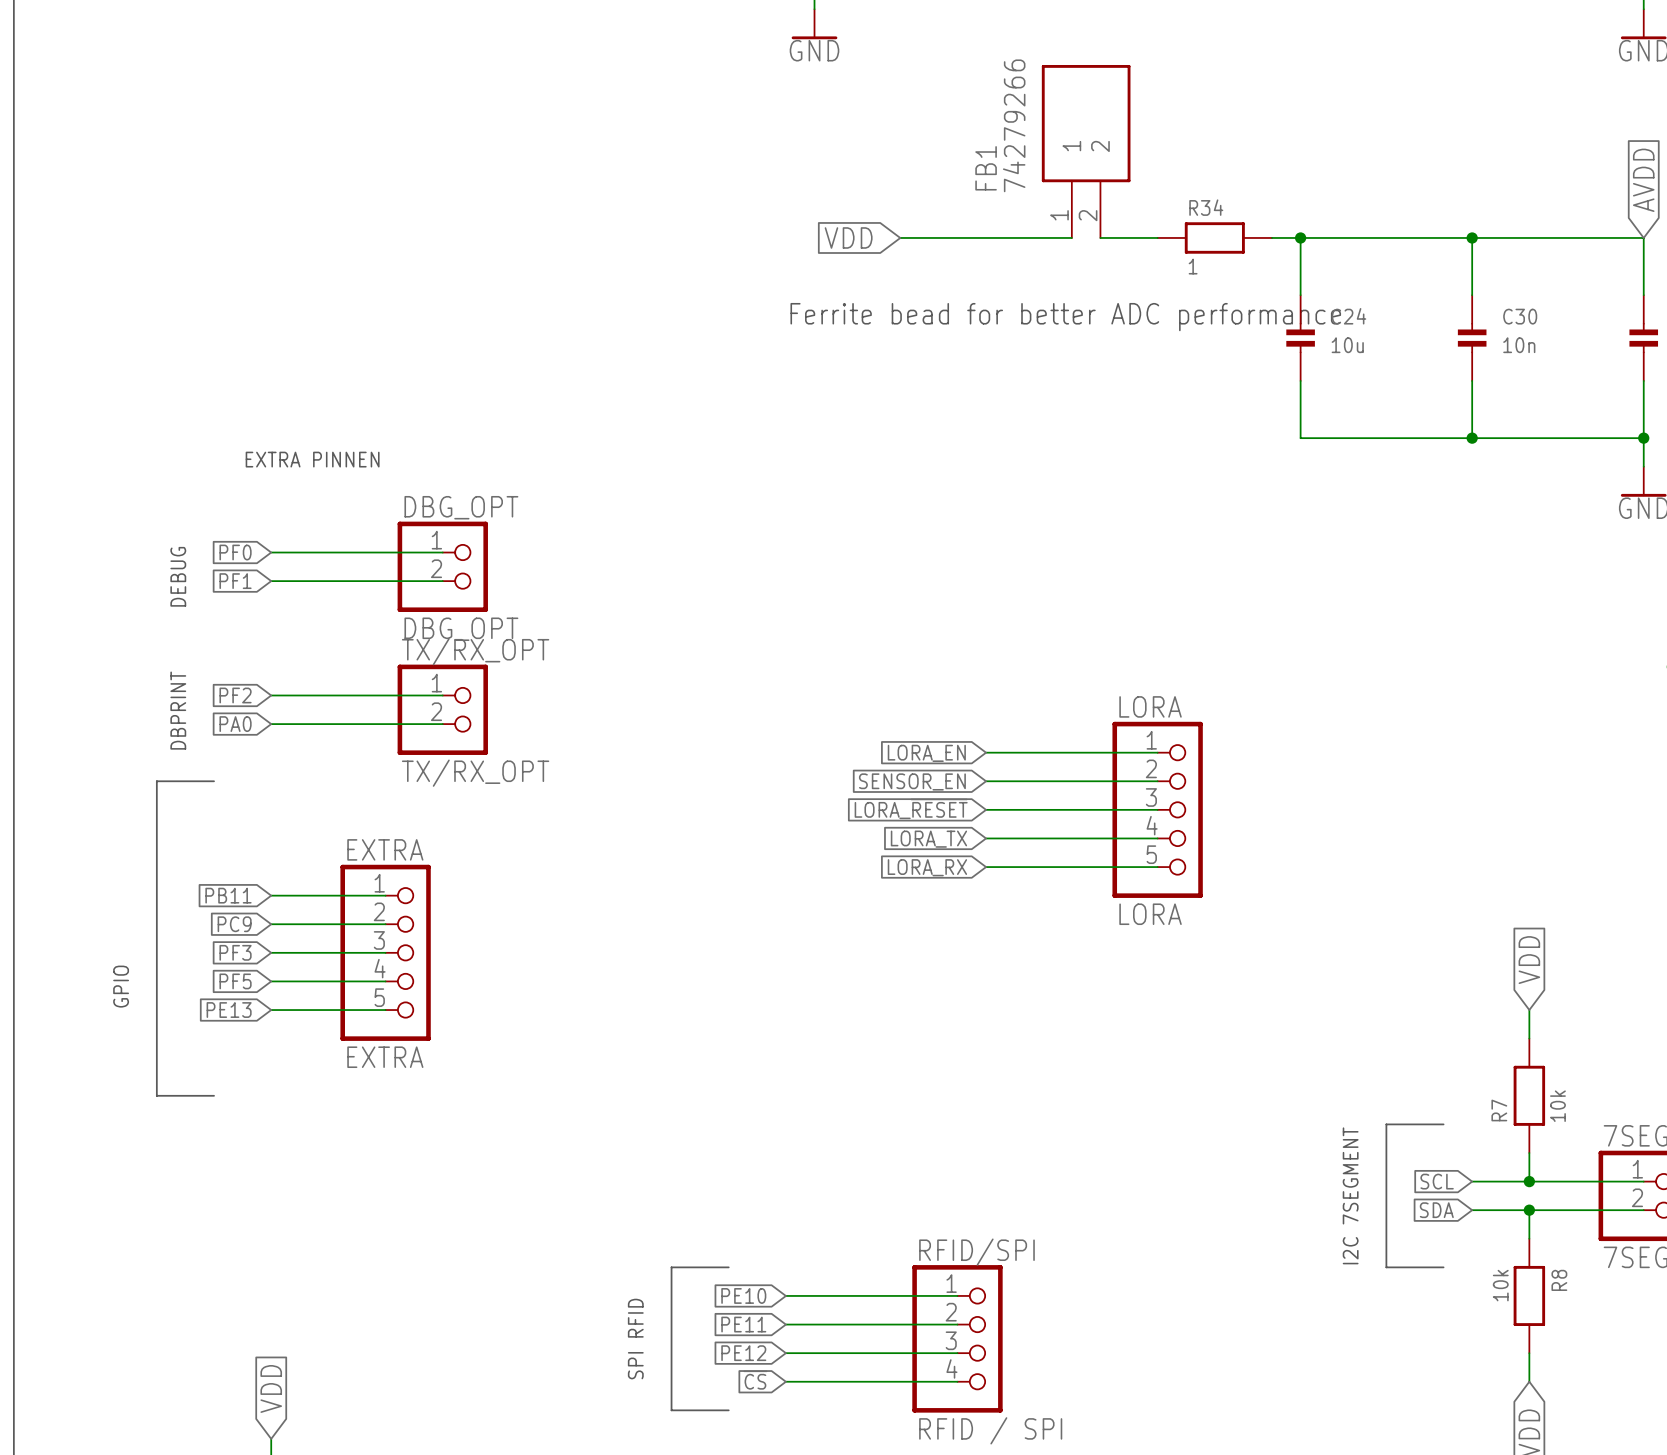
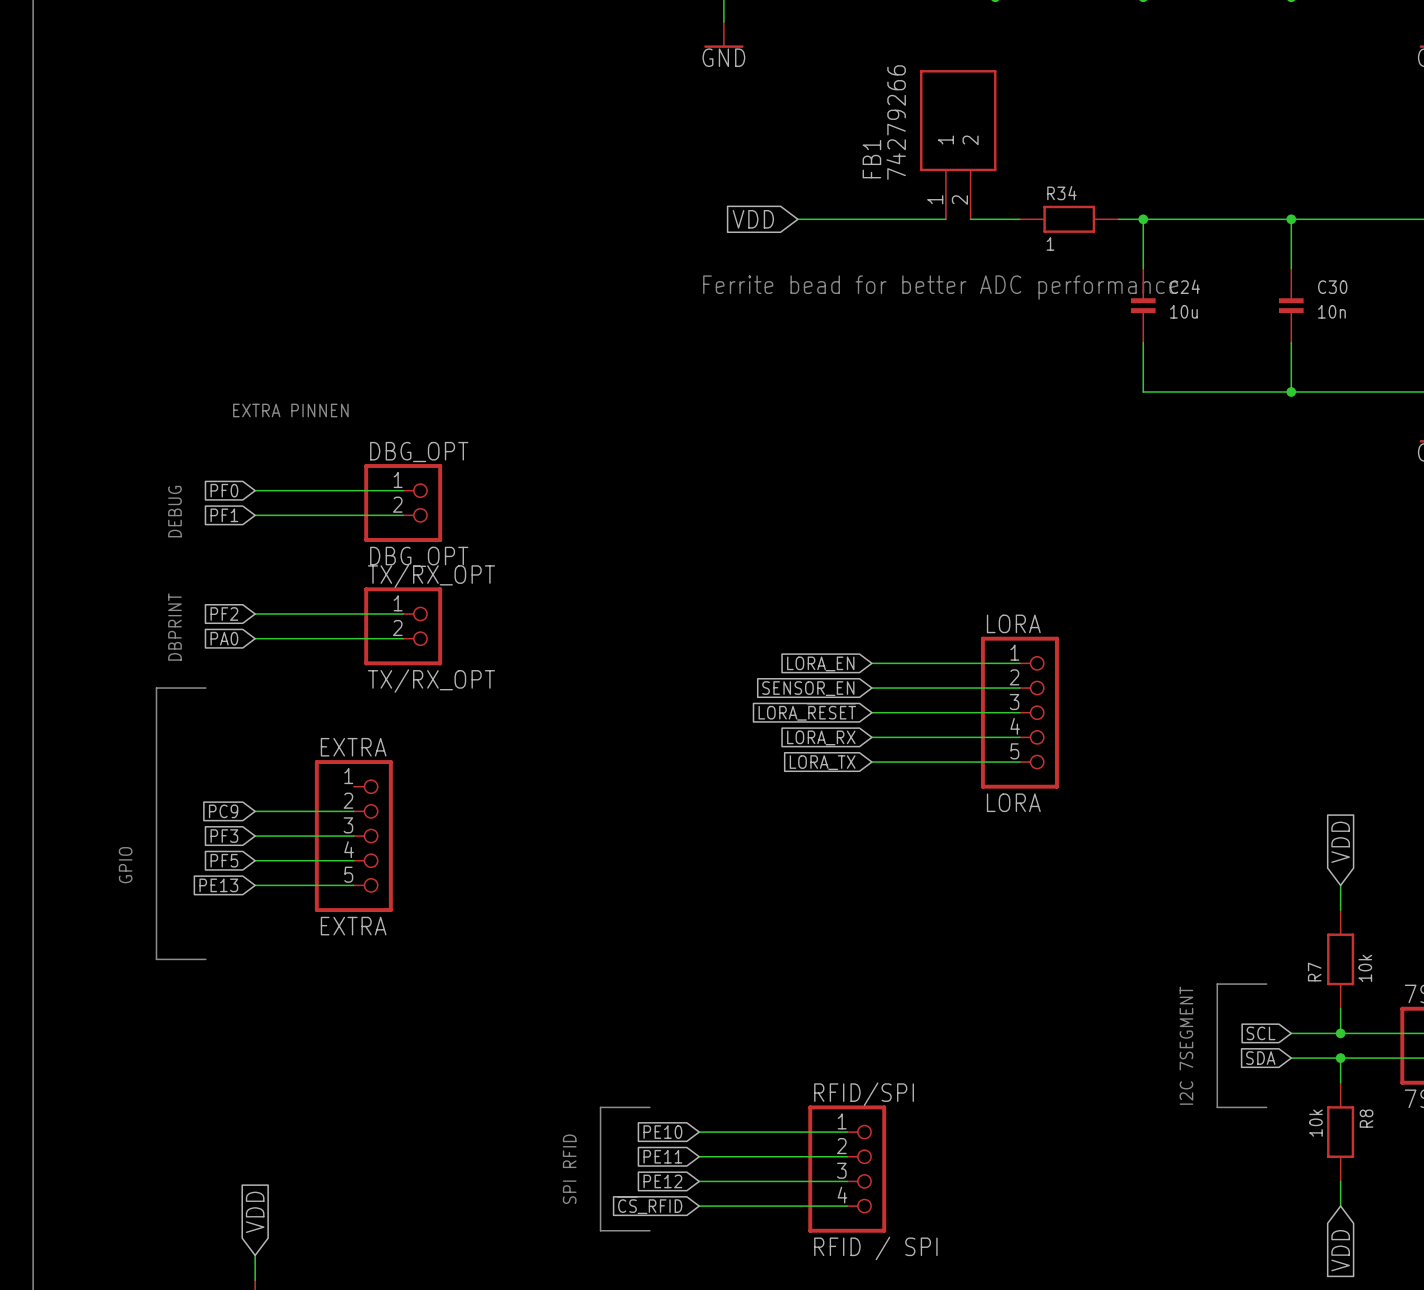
global label: LORA_TX (928, 839) -> LORA_RX (821, 737)
global label: LORA_RX (927, 867) -> LORA_TX (822, 762)
global label: PB11 (228, 895) -> none
wire: (271, 895) (385, 895) -> none
global label: ~{CS} (755, 1380) -> ~{CS}_RFID (649, 1205)

